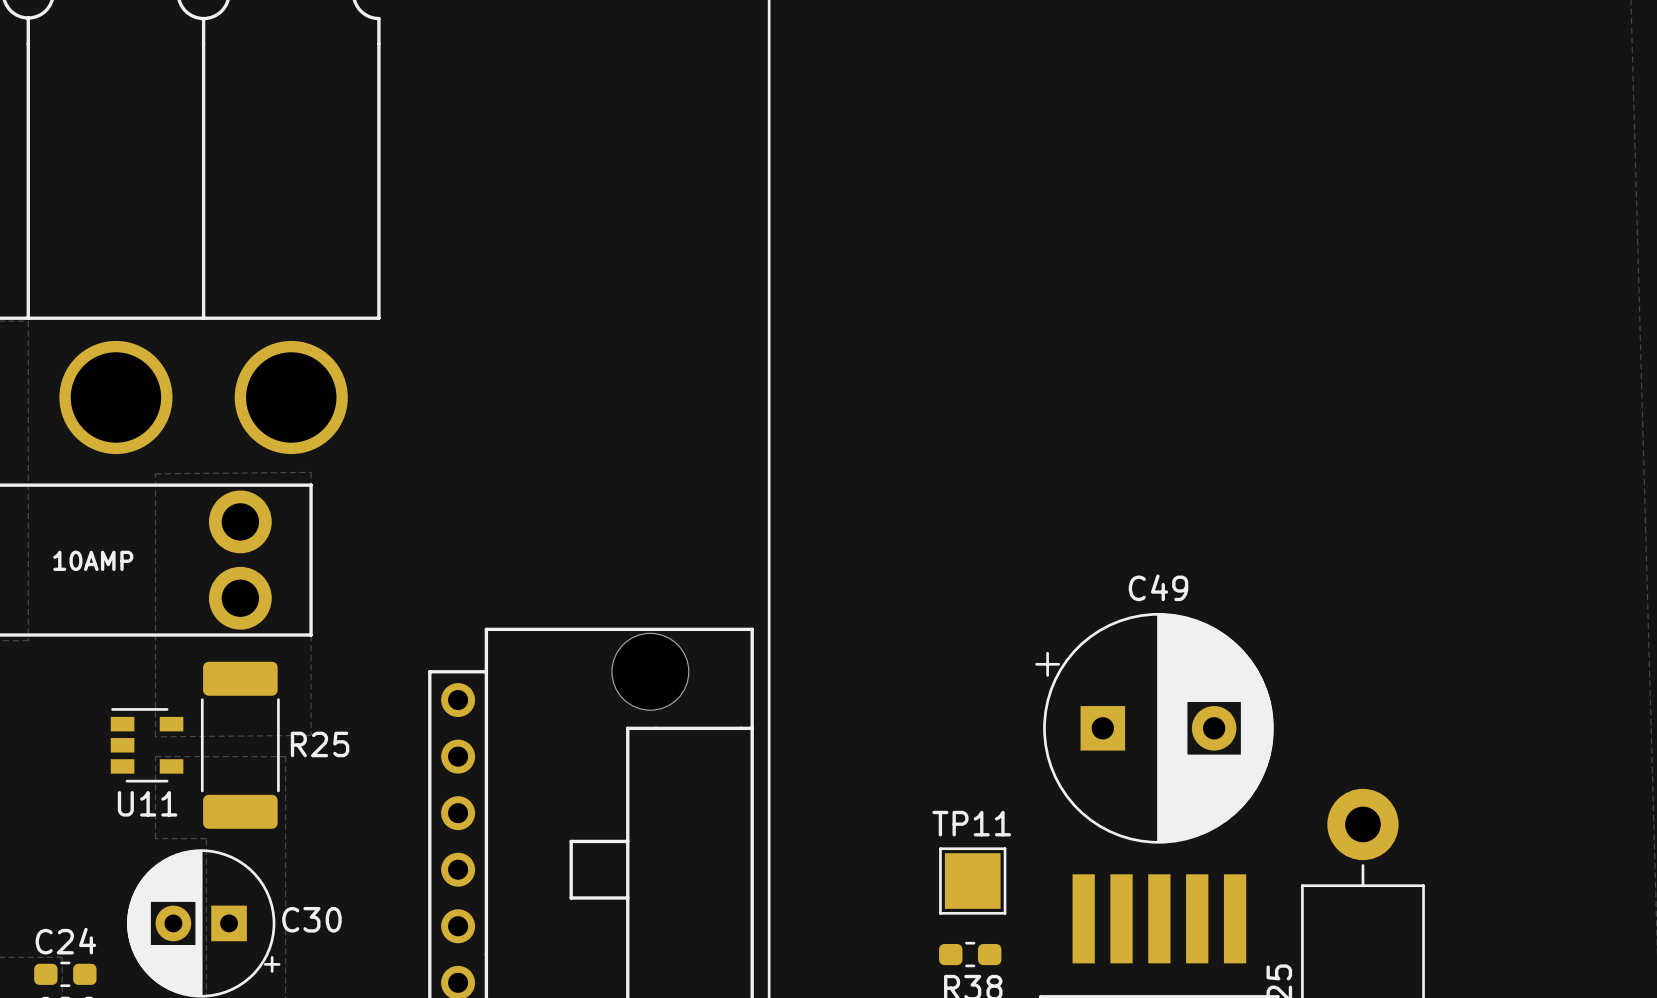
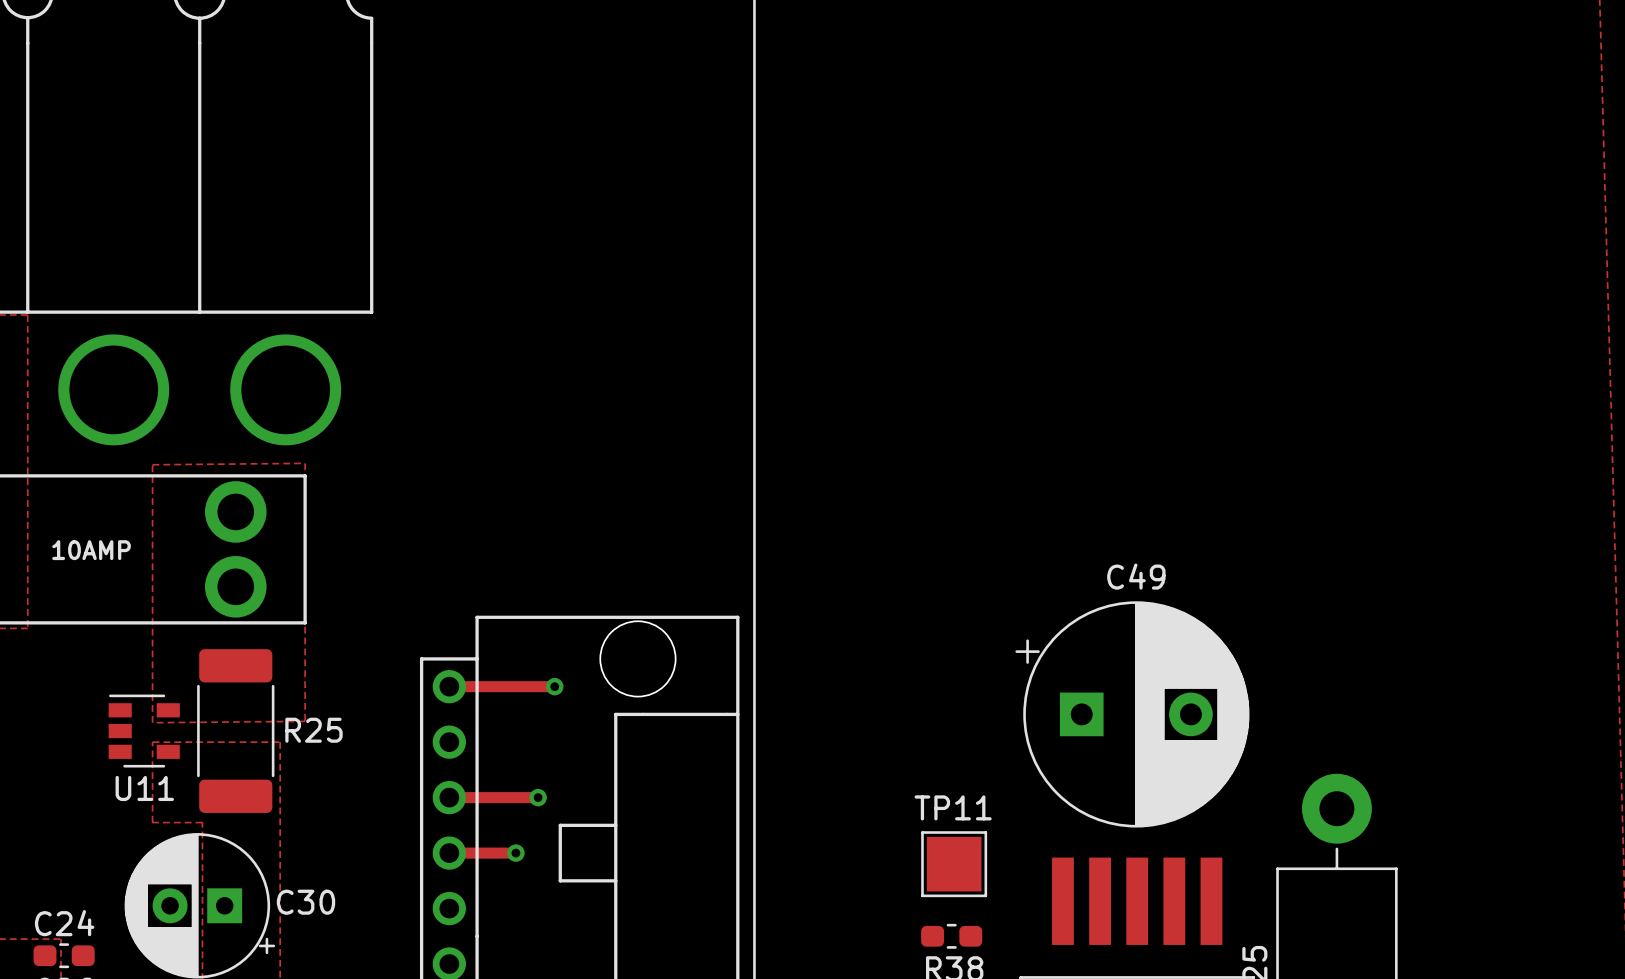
track: none -> (449, 686) (554, 686)
via: none -> (554, 686)
track: none -> (449, 797) (538, 797)
via: none -> (538, 797)
track: none -> (449, 853) (515, 853)
via: none -> (515, 853)

